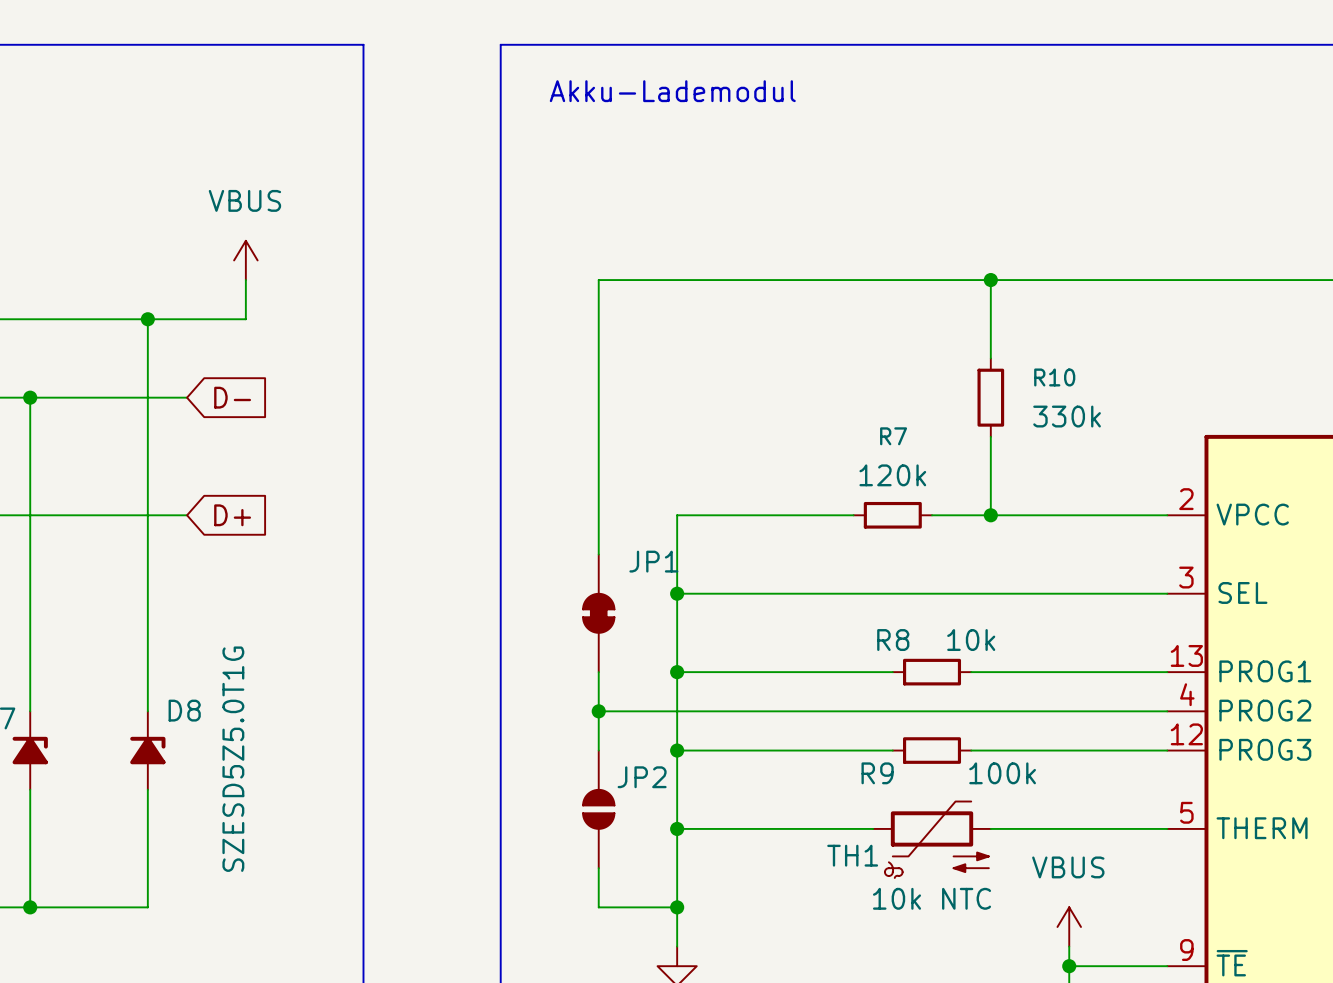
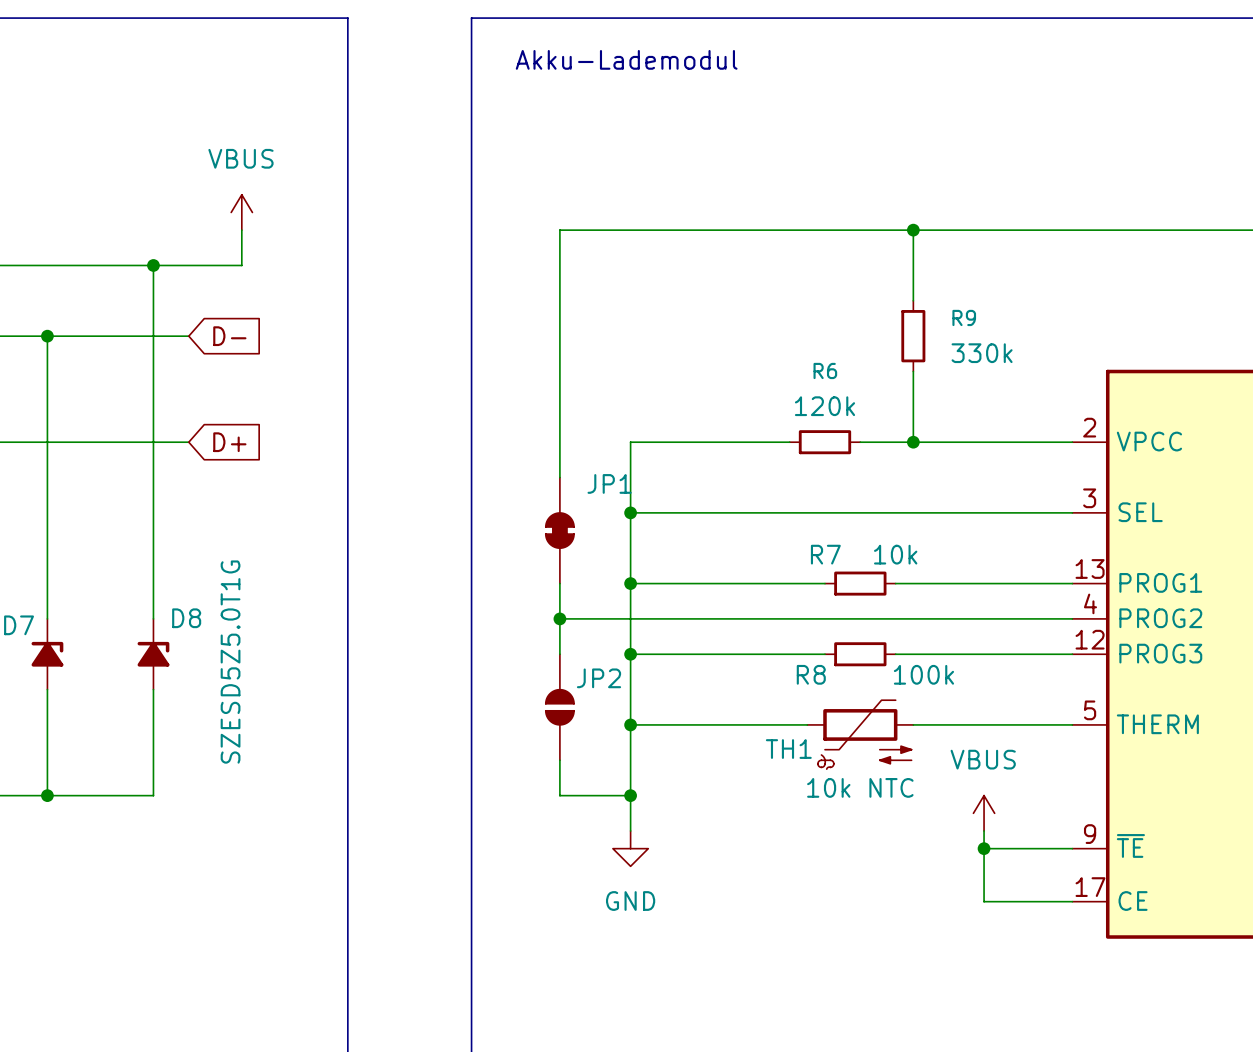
R10 name: R10 (1054, 377) -> R9 (964, 317)
R7 name: R7 (893, 436) -> R6 (825, 370)
R8 name: R8 (893, 640) -> R7 (825, 554)
R9 name: R9 (877, 773) -> R8 (811, 674)

